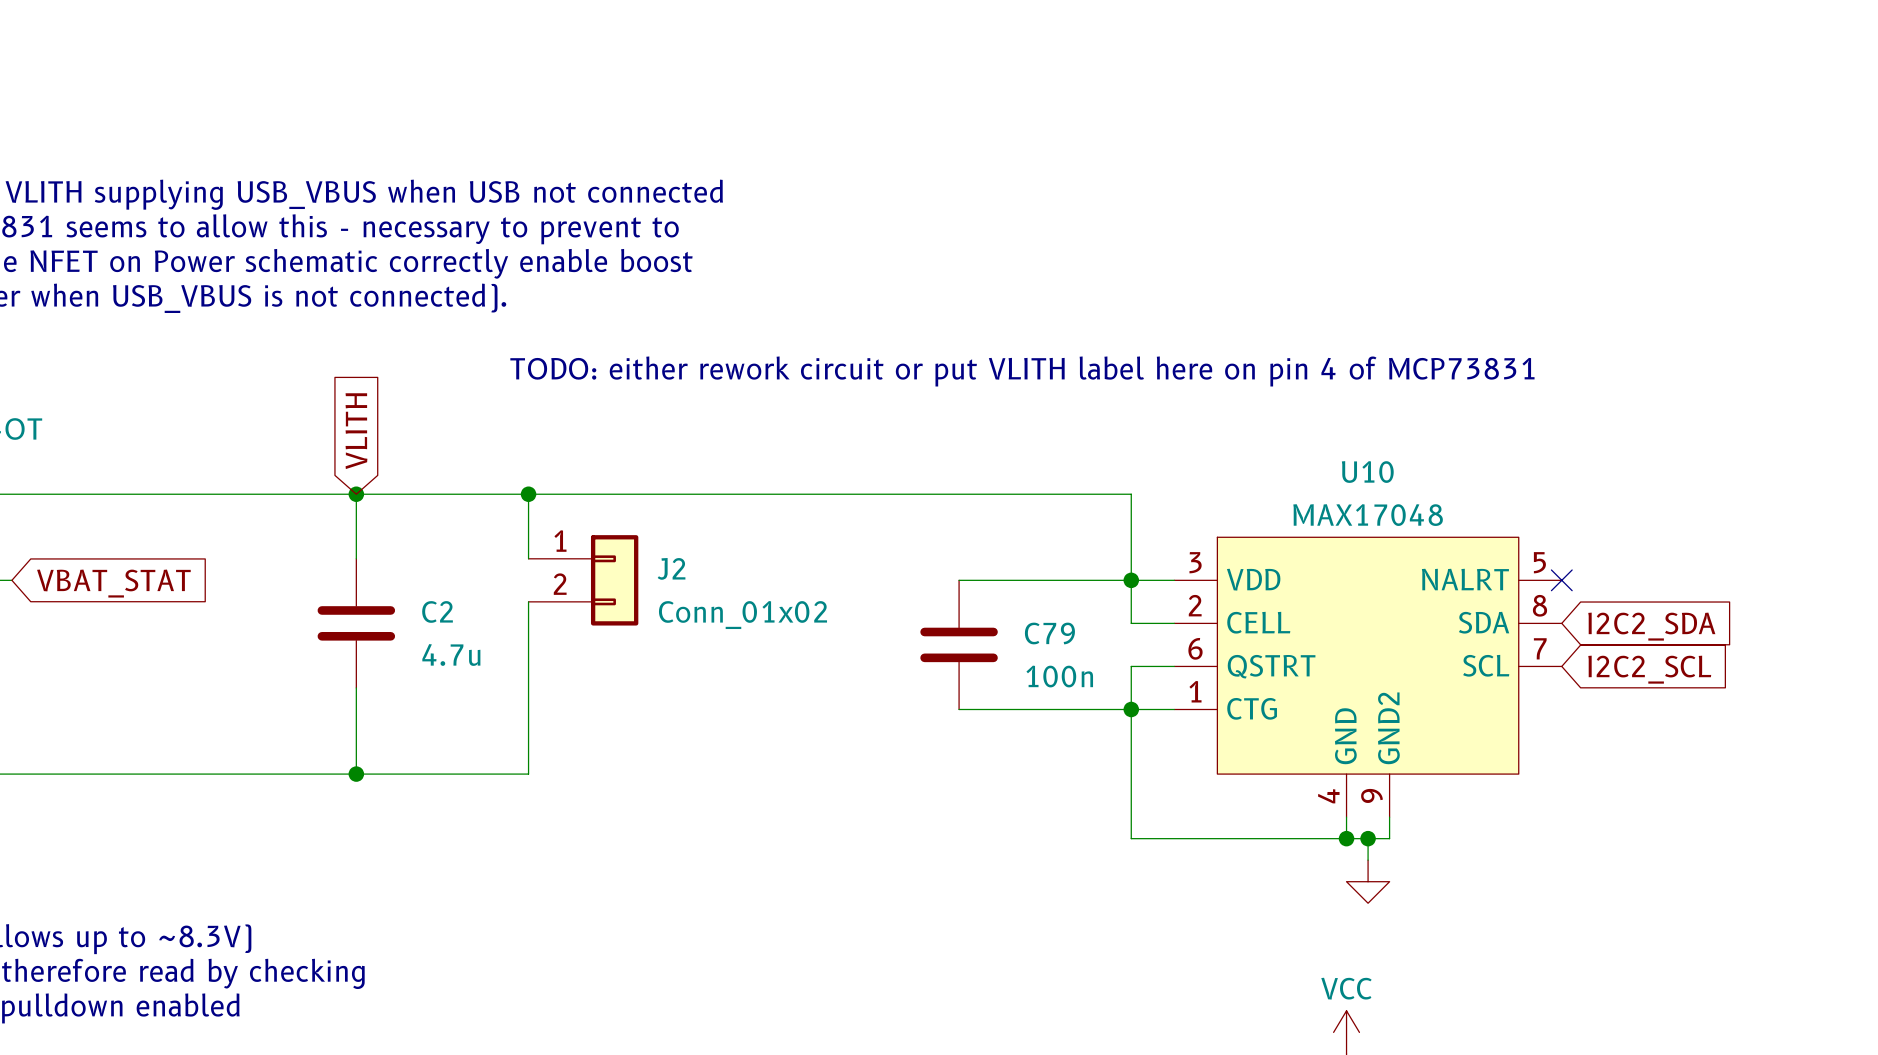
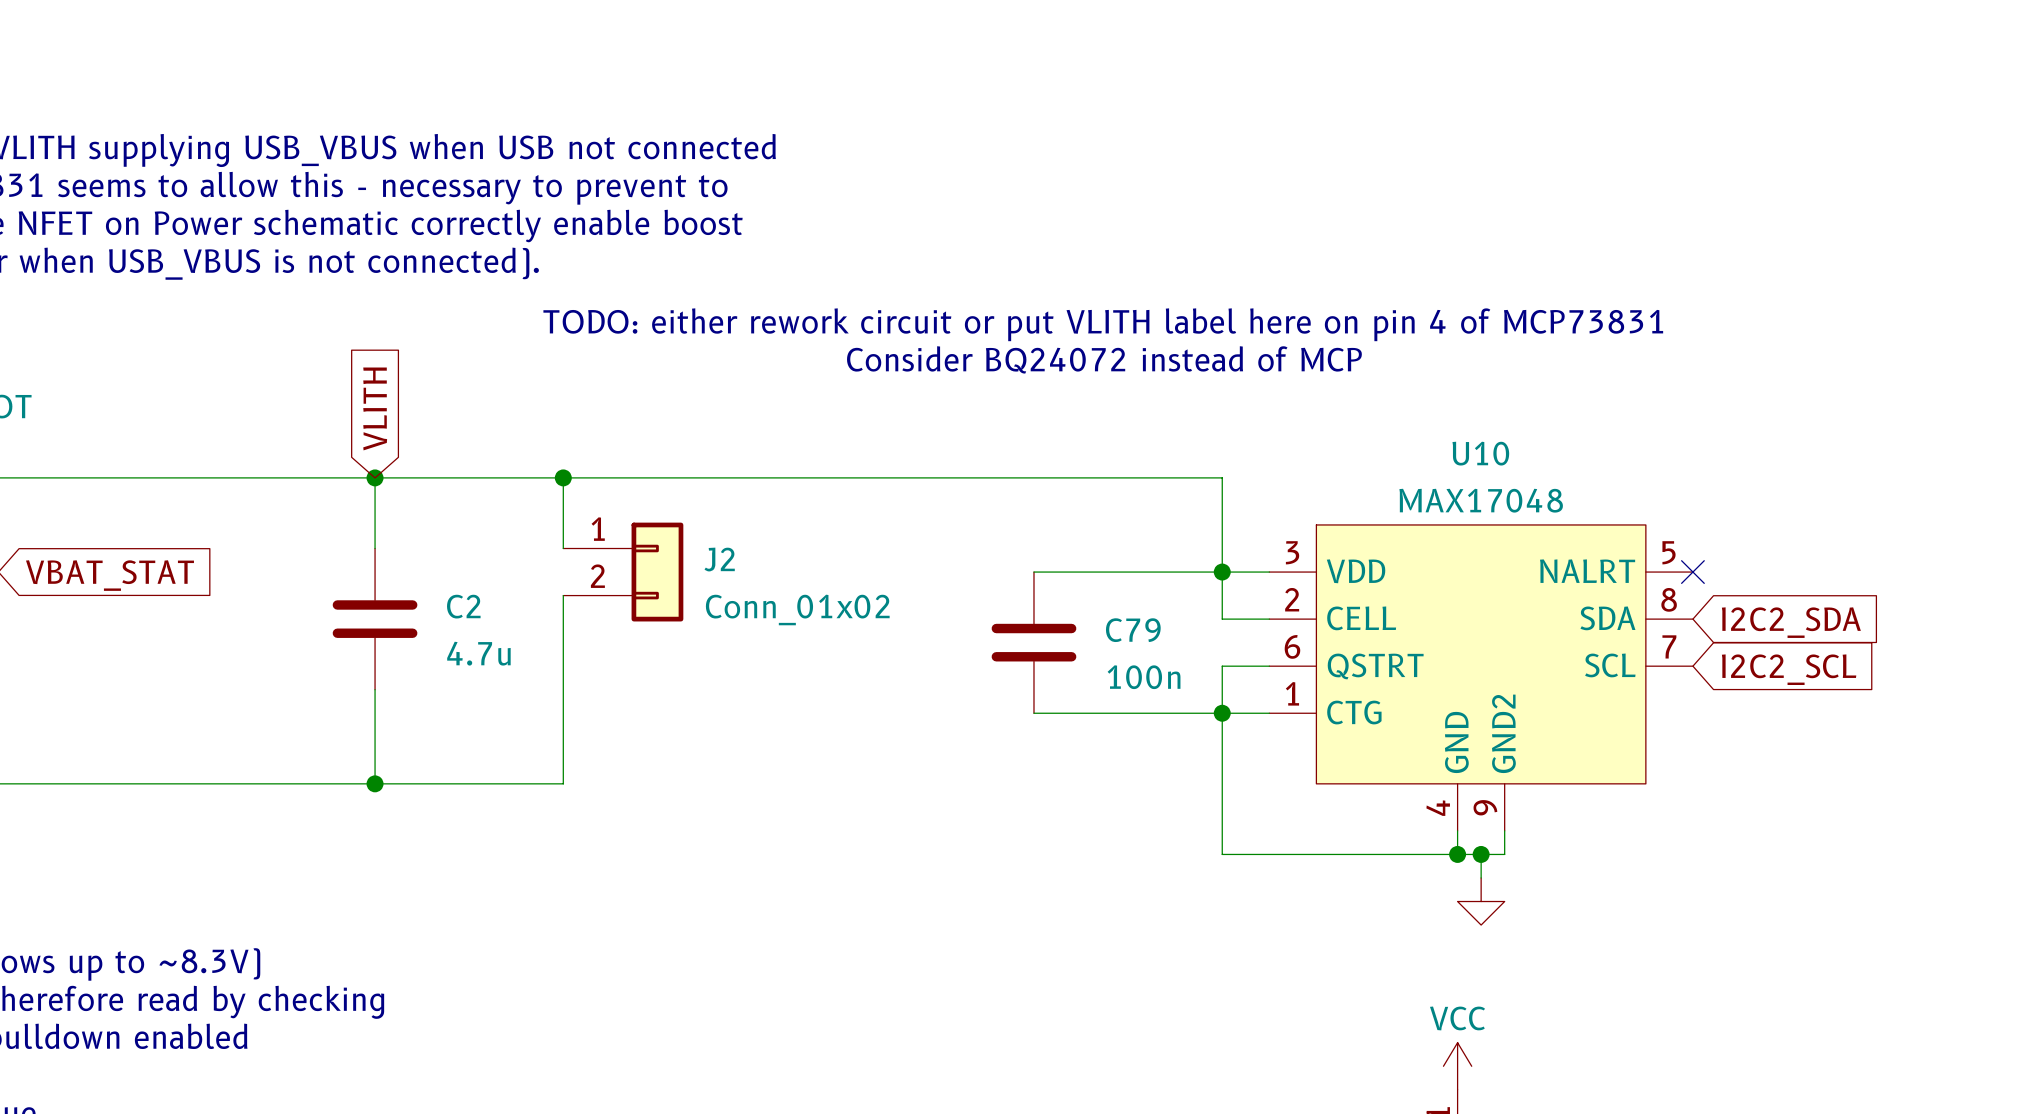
text position: TODO: either rework circuit or put VLITH label here on pin 4 of MCP73831 (1022, 371) -> TODO: either rework circuit or put VLITH label here on pin 4 of MCP73831 (1103, 324)
text: none -> Consider BQ24072 instead of MCP (1104, 359)

